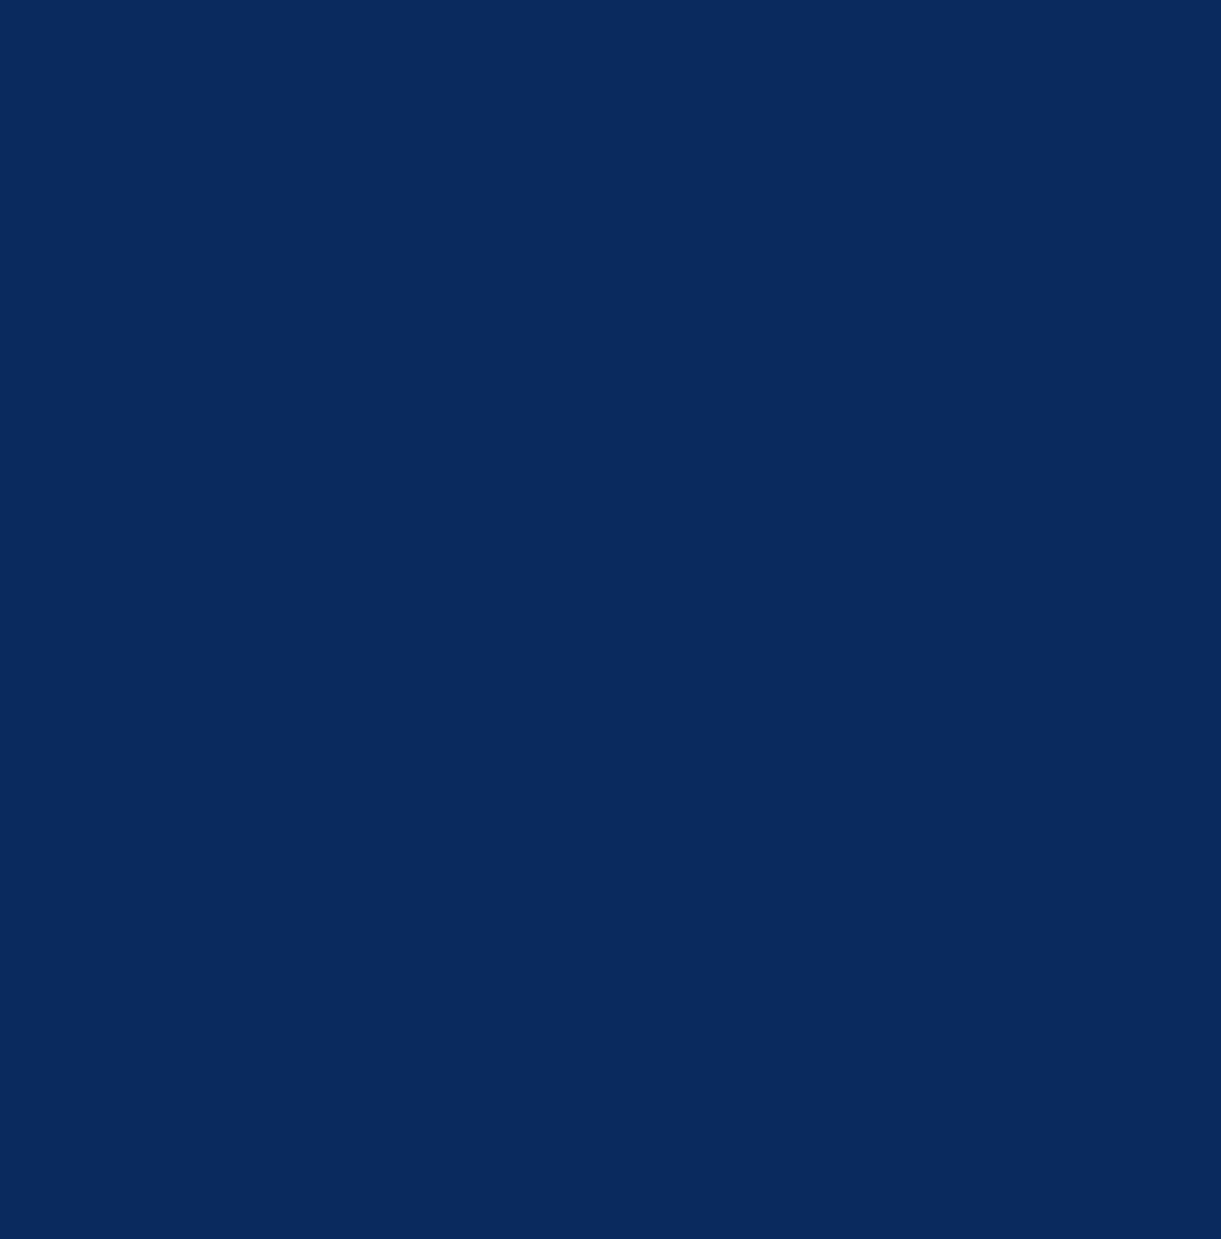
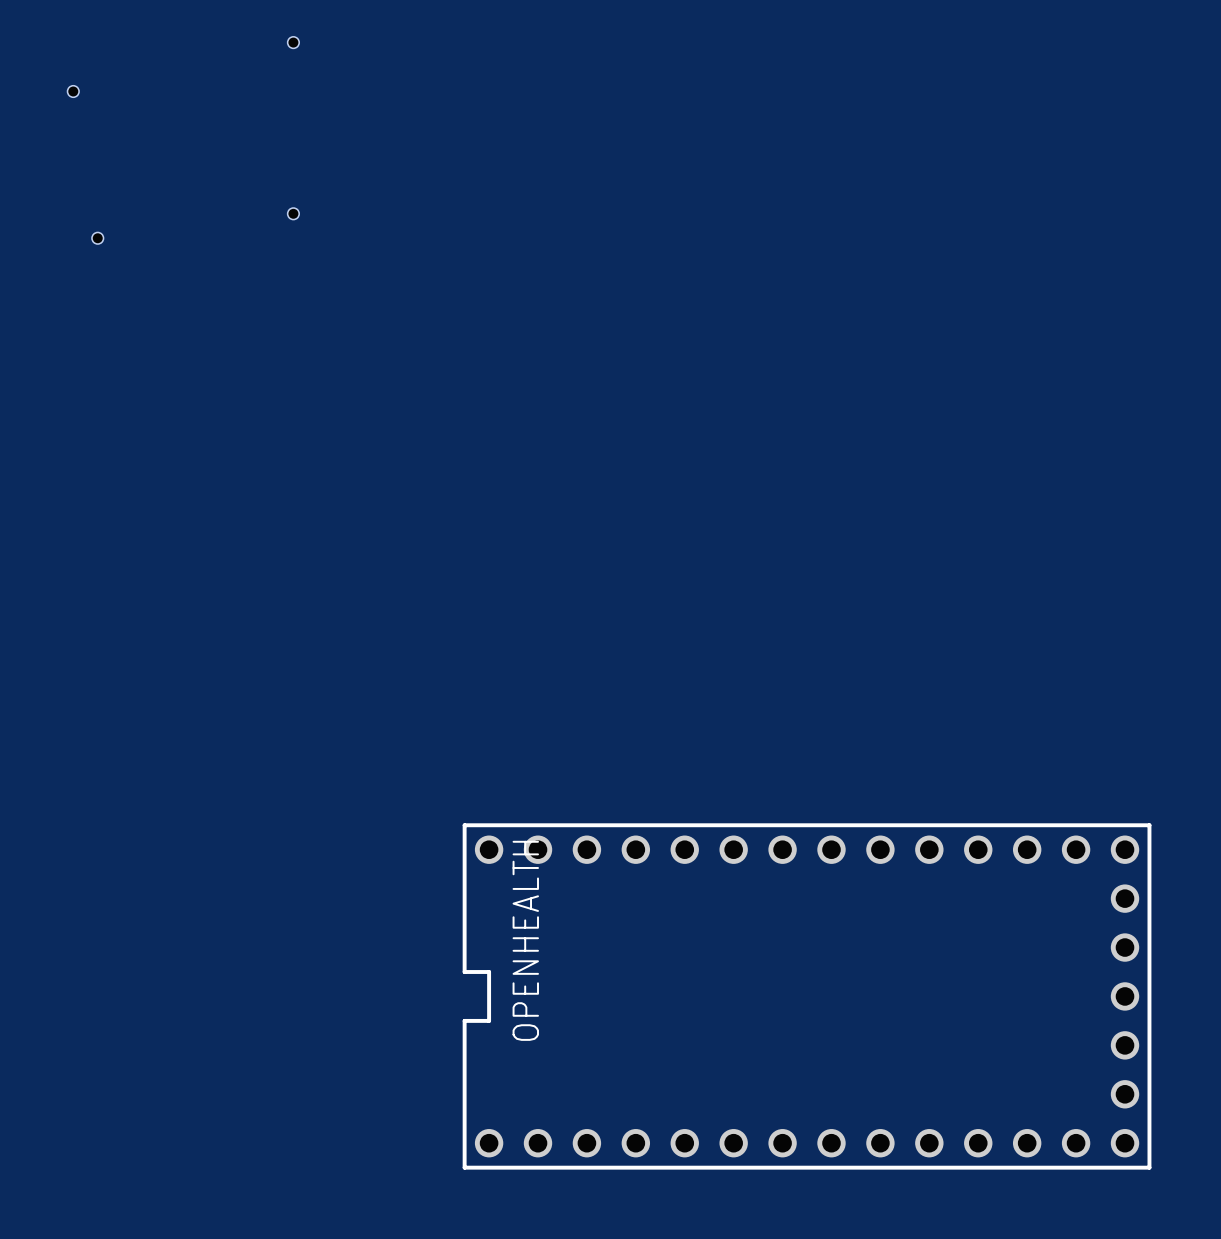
hole: none -> (293, 42)
hole: none -> (73, 91)
hole: none -> (293, 213)
hole: none -> (97, 238)
OPENHEALTH: none -> (807, 996)

